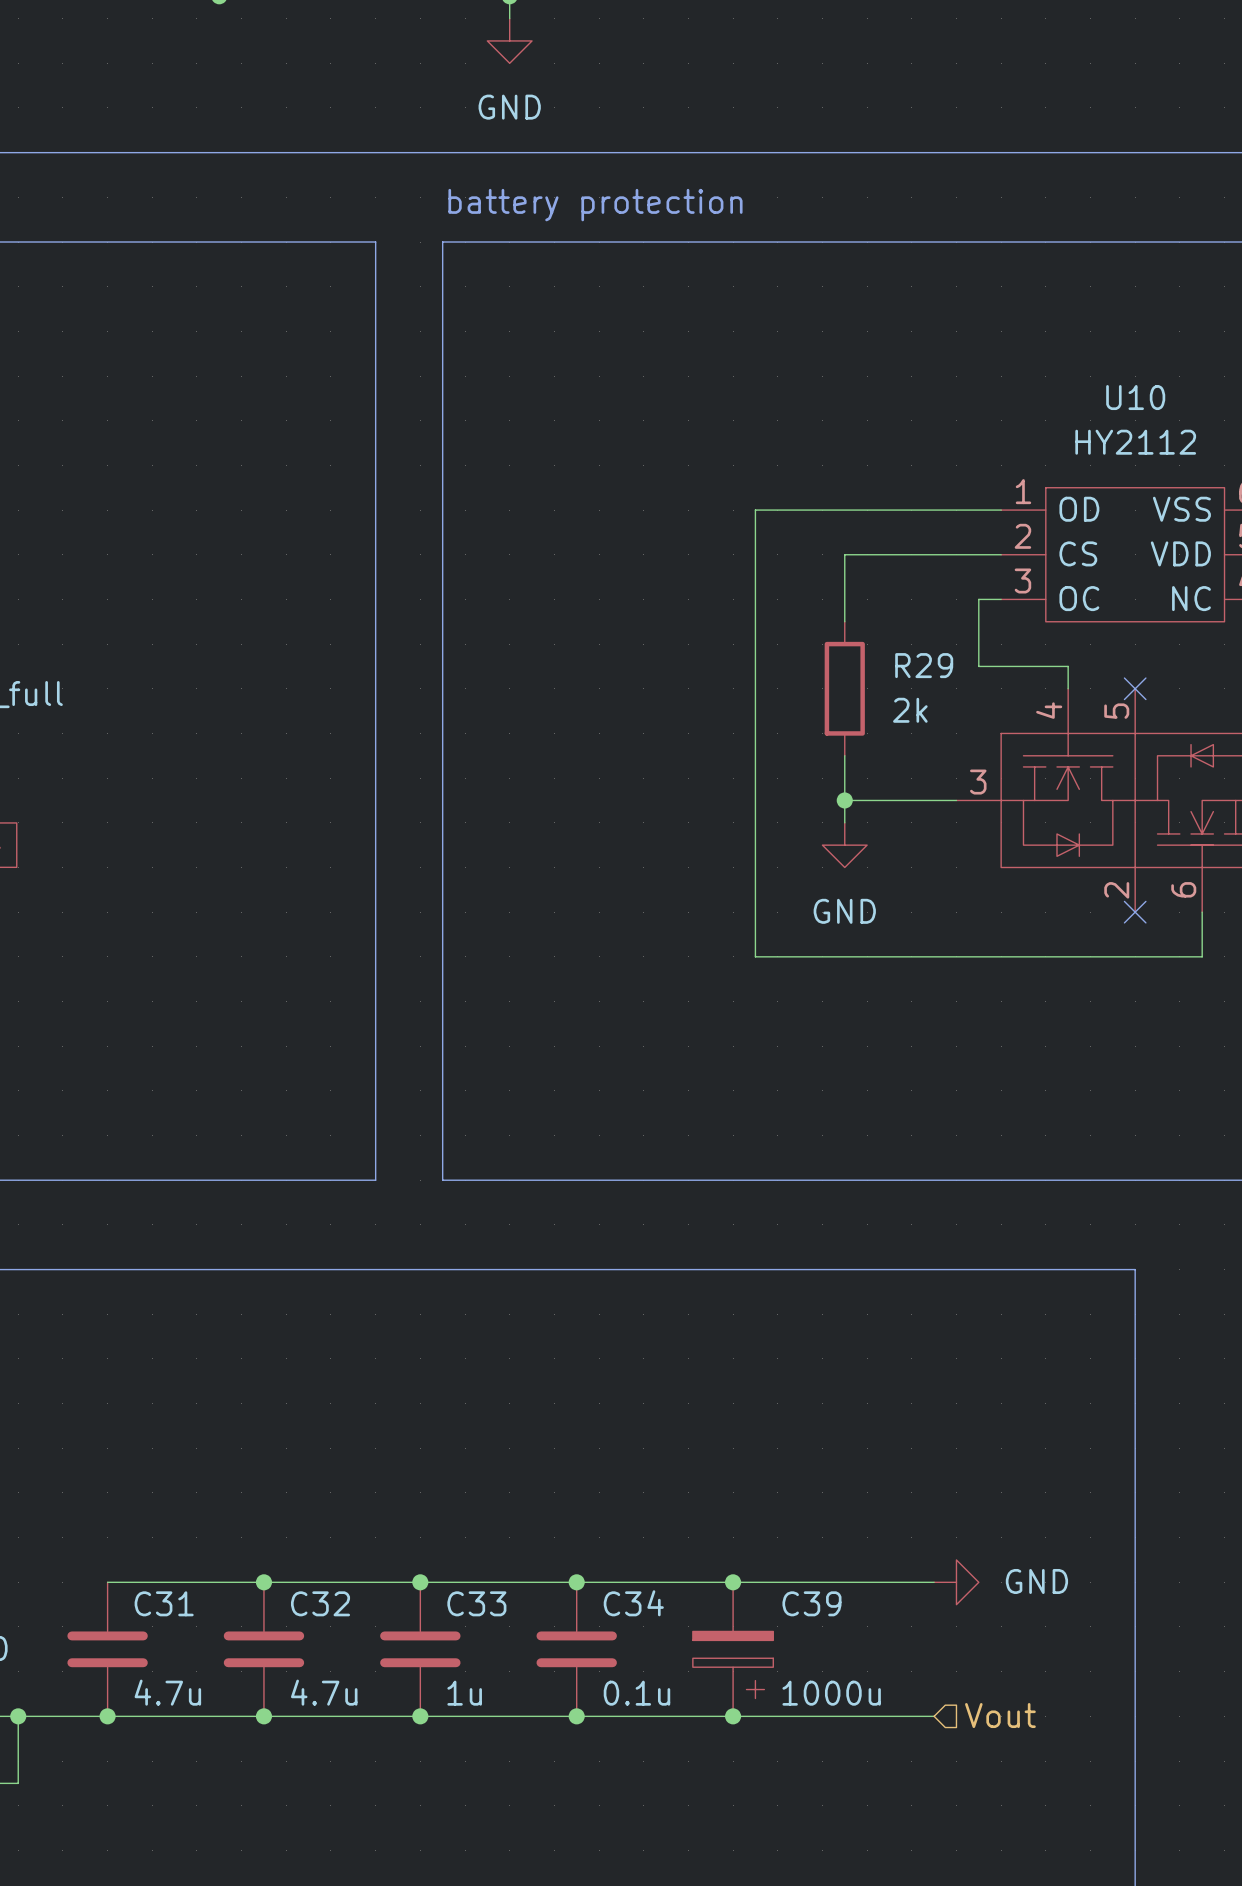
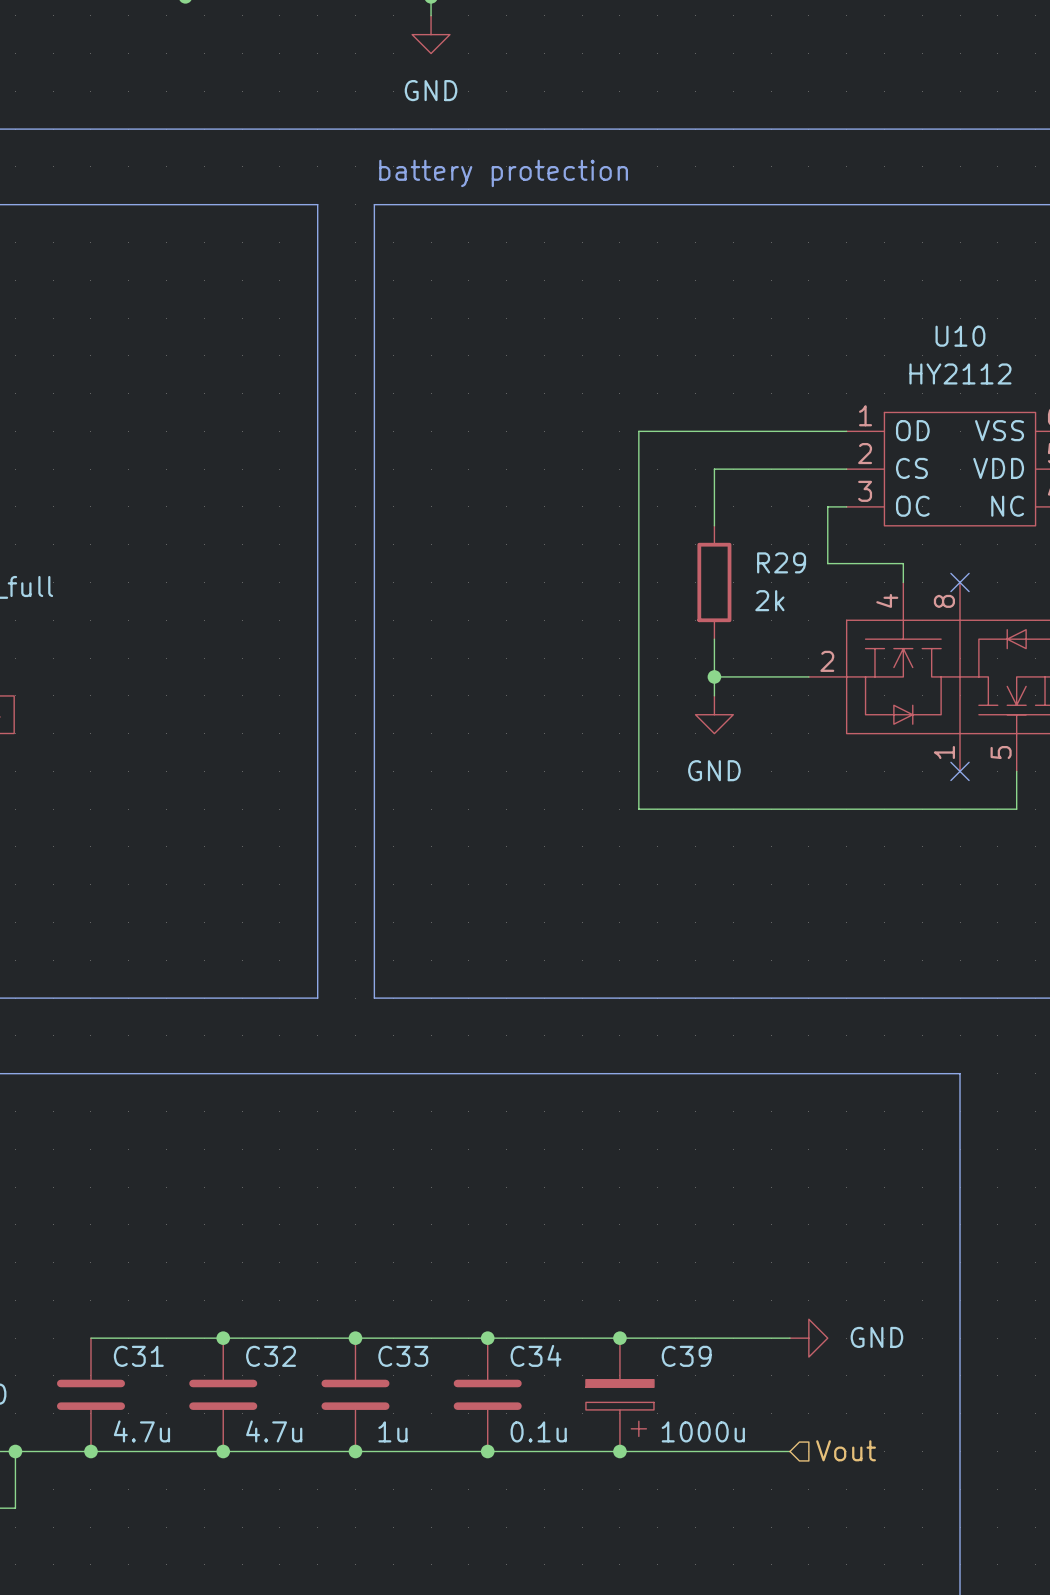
part pin number: 5 (1116, 711) -> 8 (944, 601)
part pin number: 3 (978, 782) -> 2 (827, 661)
part pin number: 6 (1183, 889) -> 5 (1001, 752)
part pin number: 2 (1116, 890) -> 1 (944, 752)

